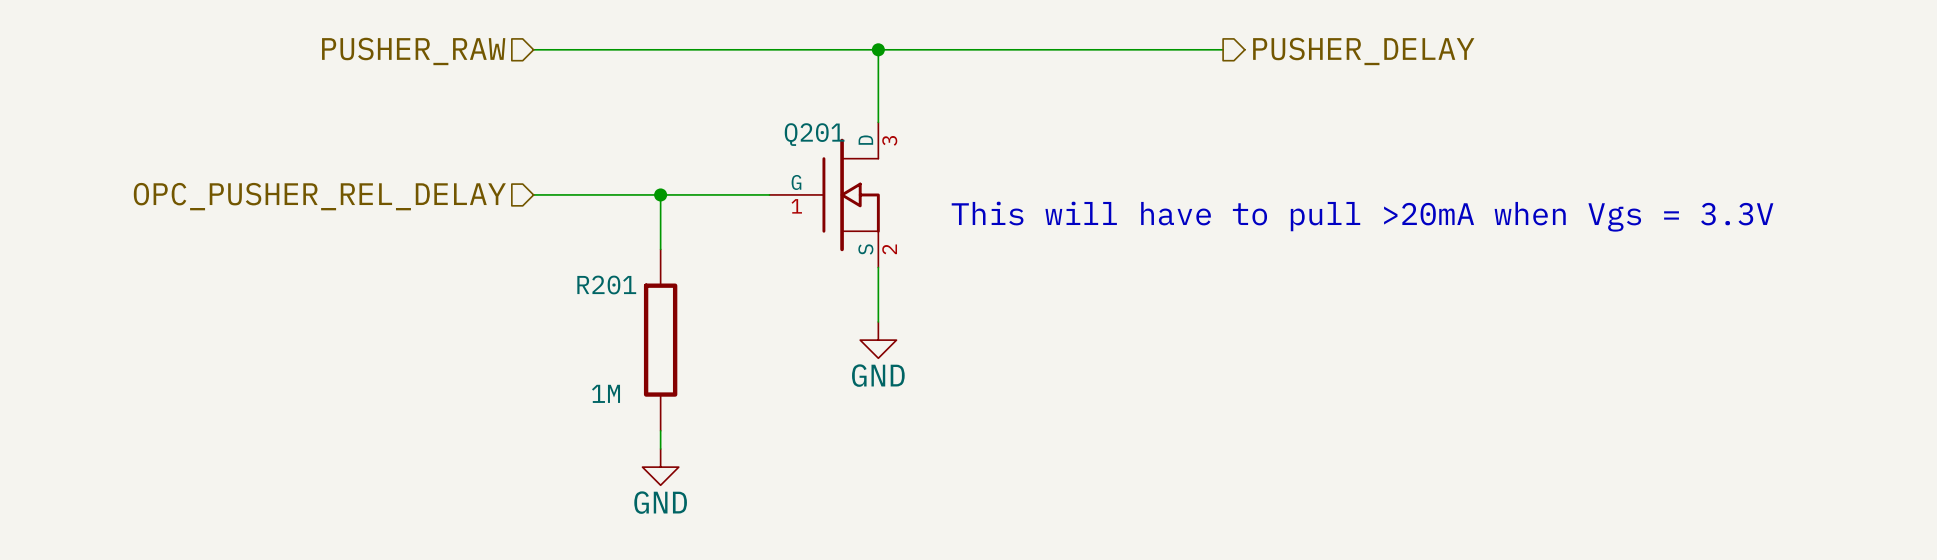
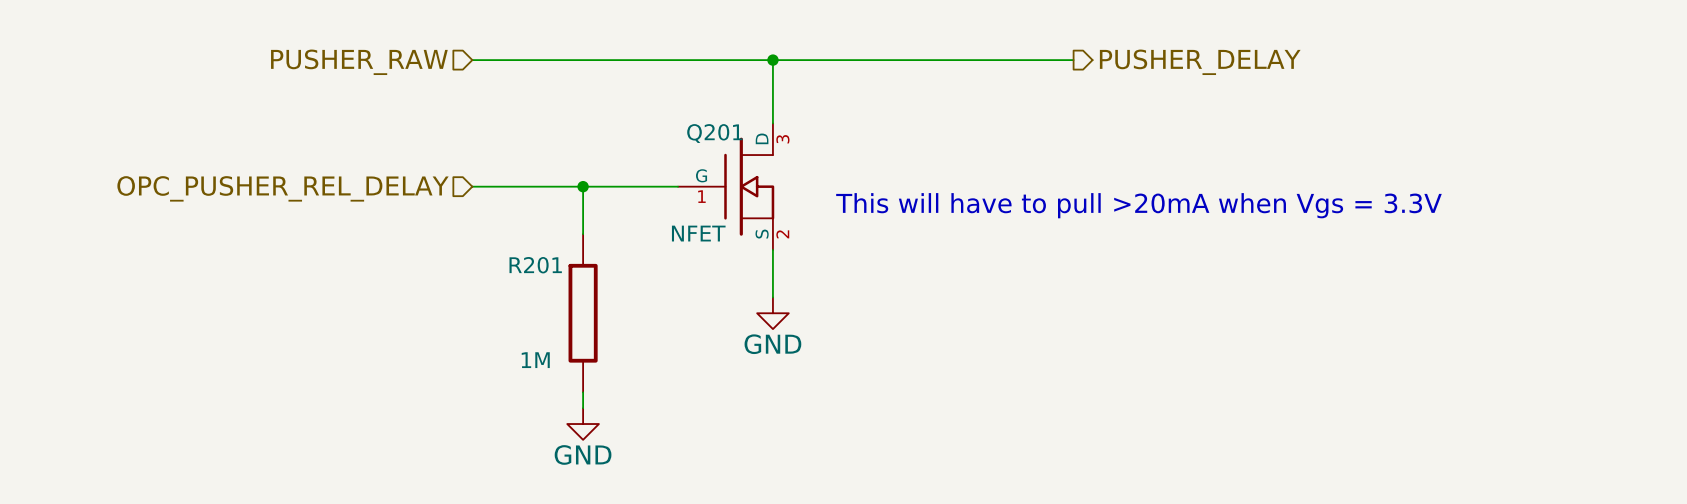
Q201 value: none -> NFET (698, 233)

